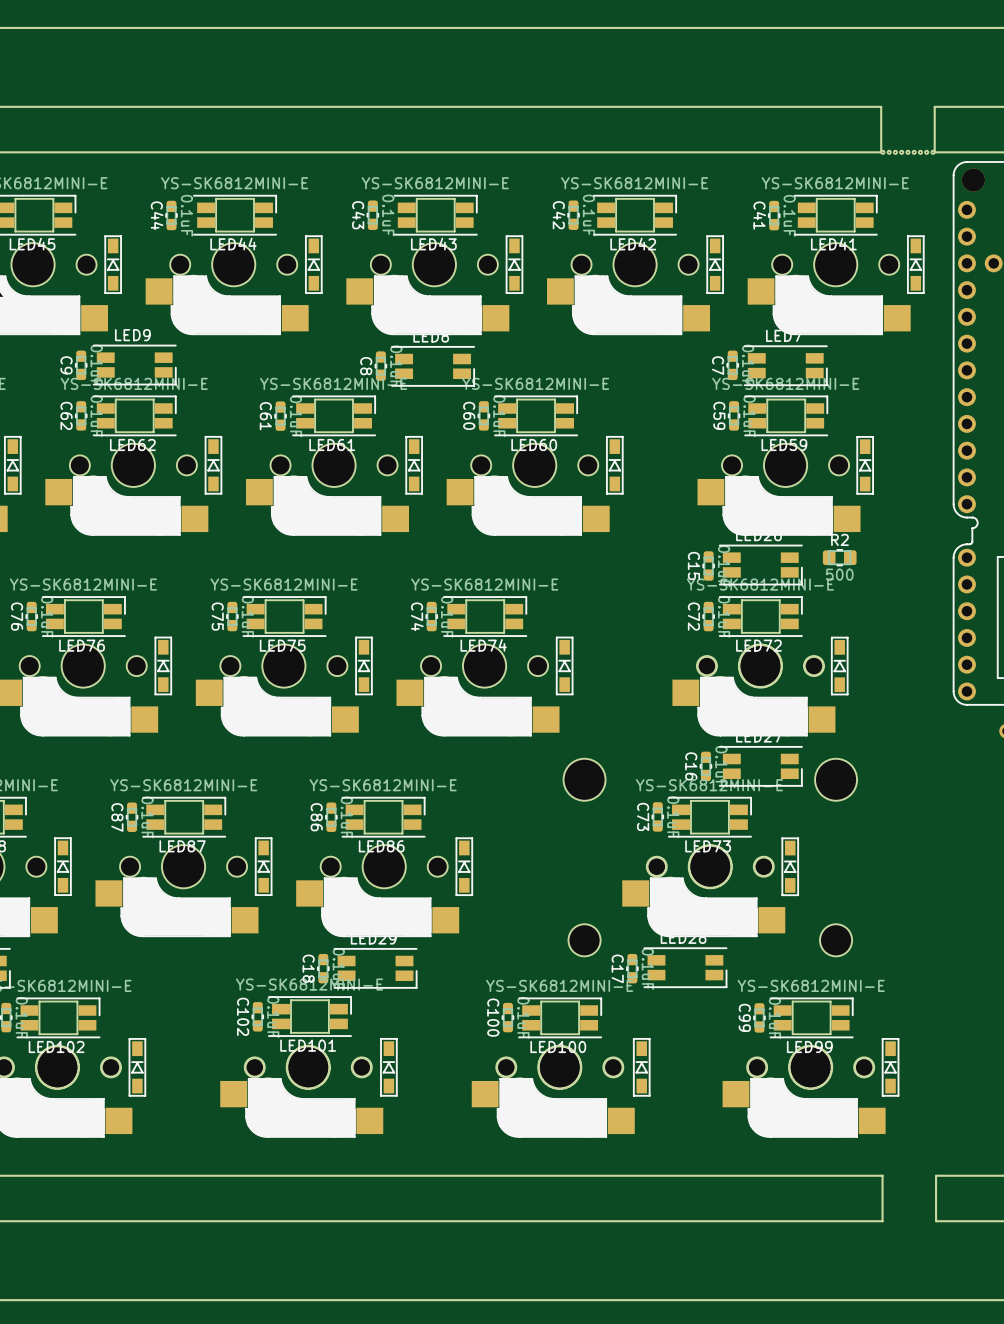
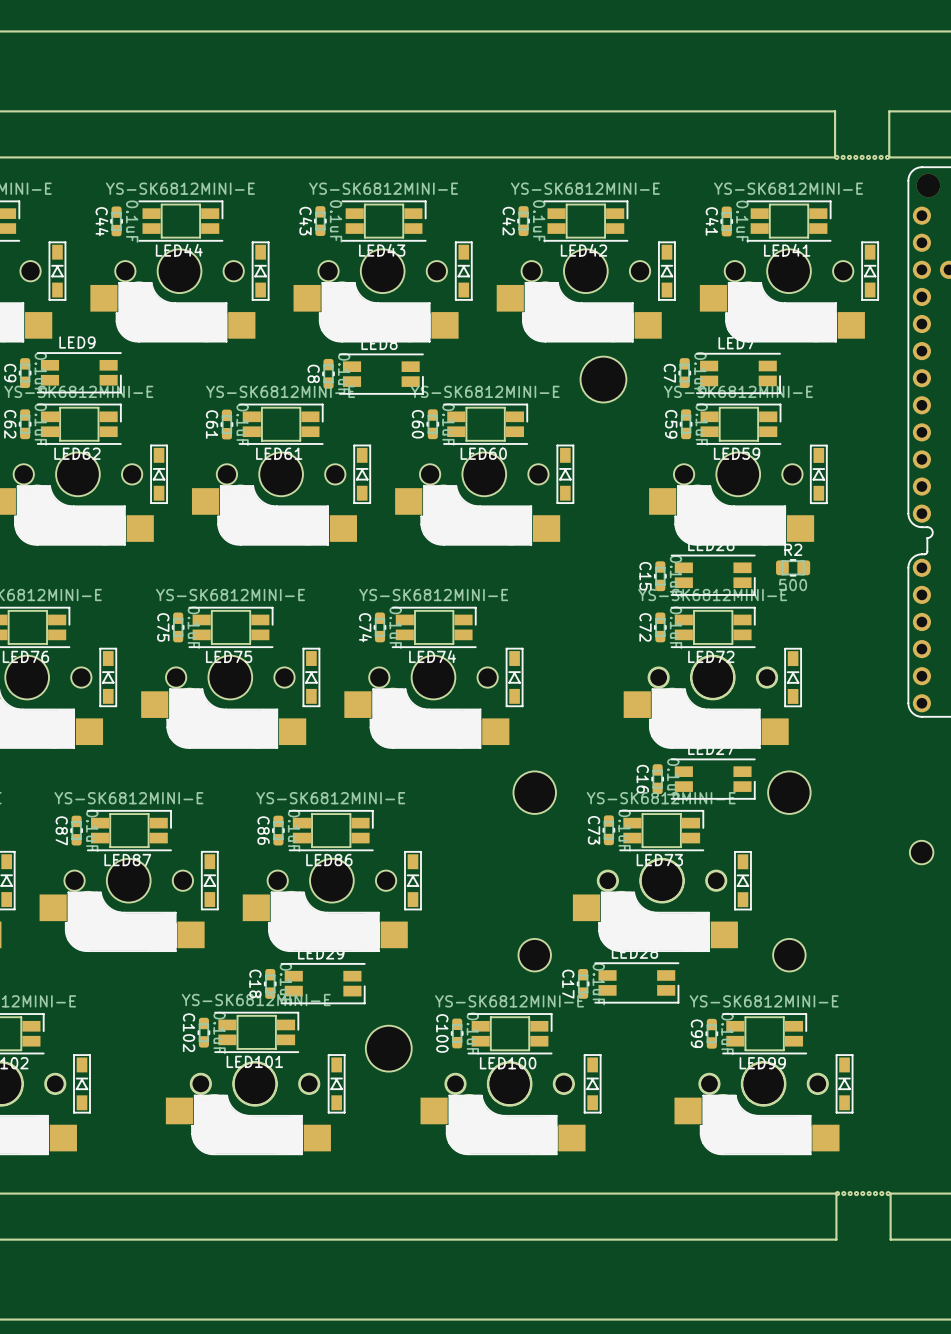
part: none -> (603, 379)
part: none -> (921, 852)
part: none -> (388, 1048)
part: none -> (862, 1193)

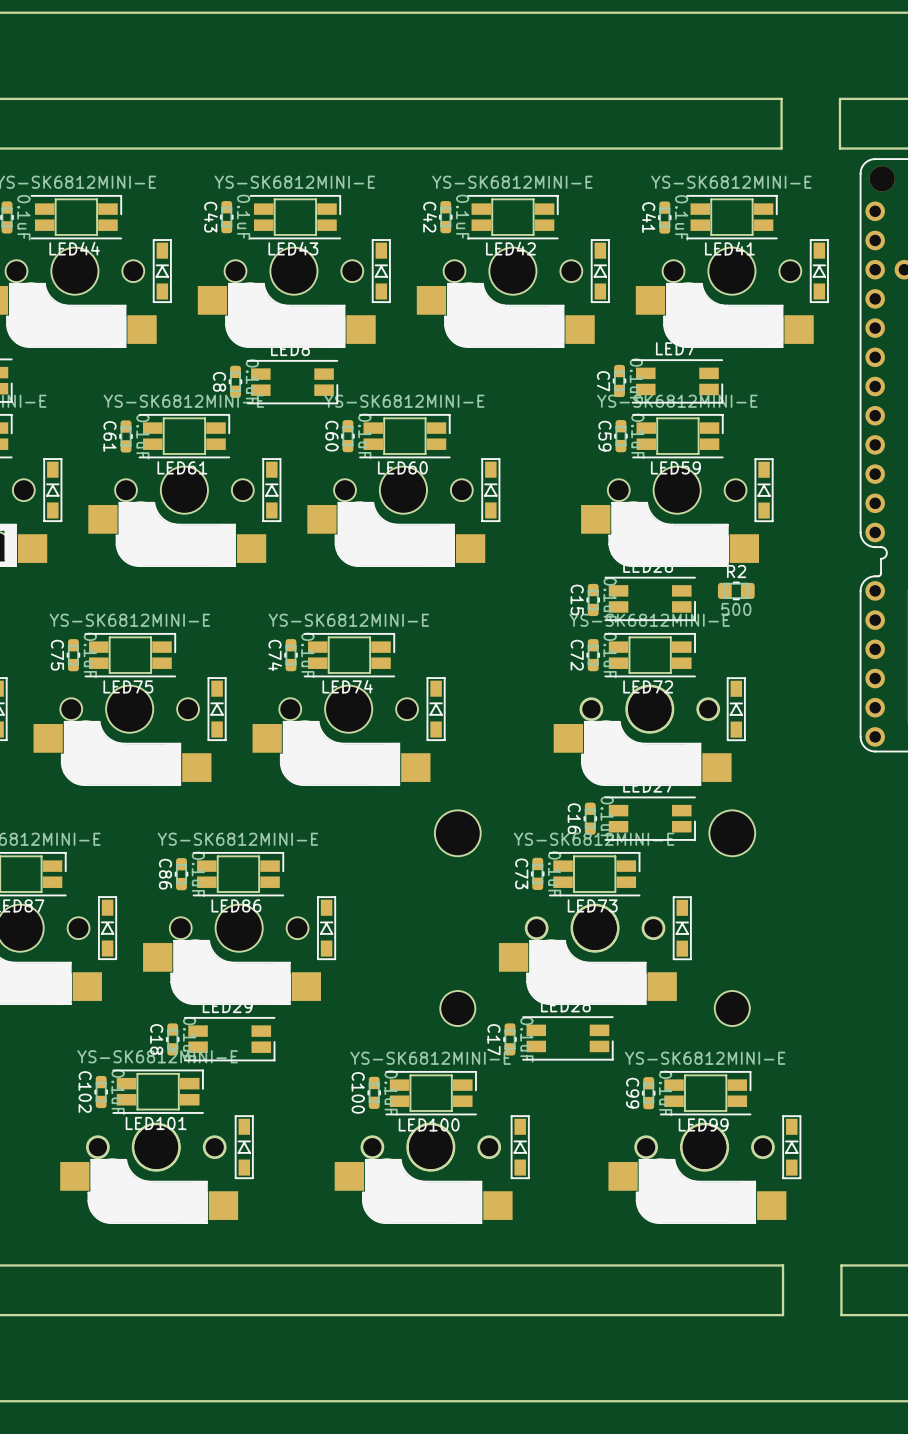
part: (862, 157) -> none
part: (603, 379) -> none
part: (921, 852) -> none
part: (388, 1048) -> none
part: (862, 1193) -> none

